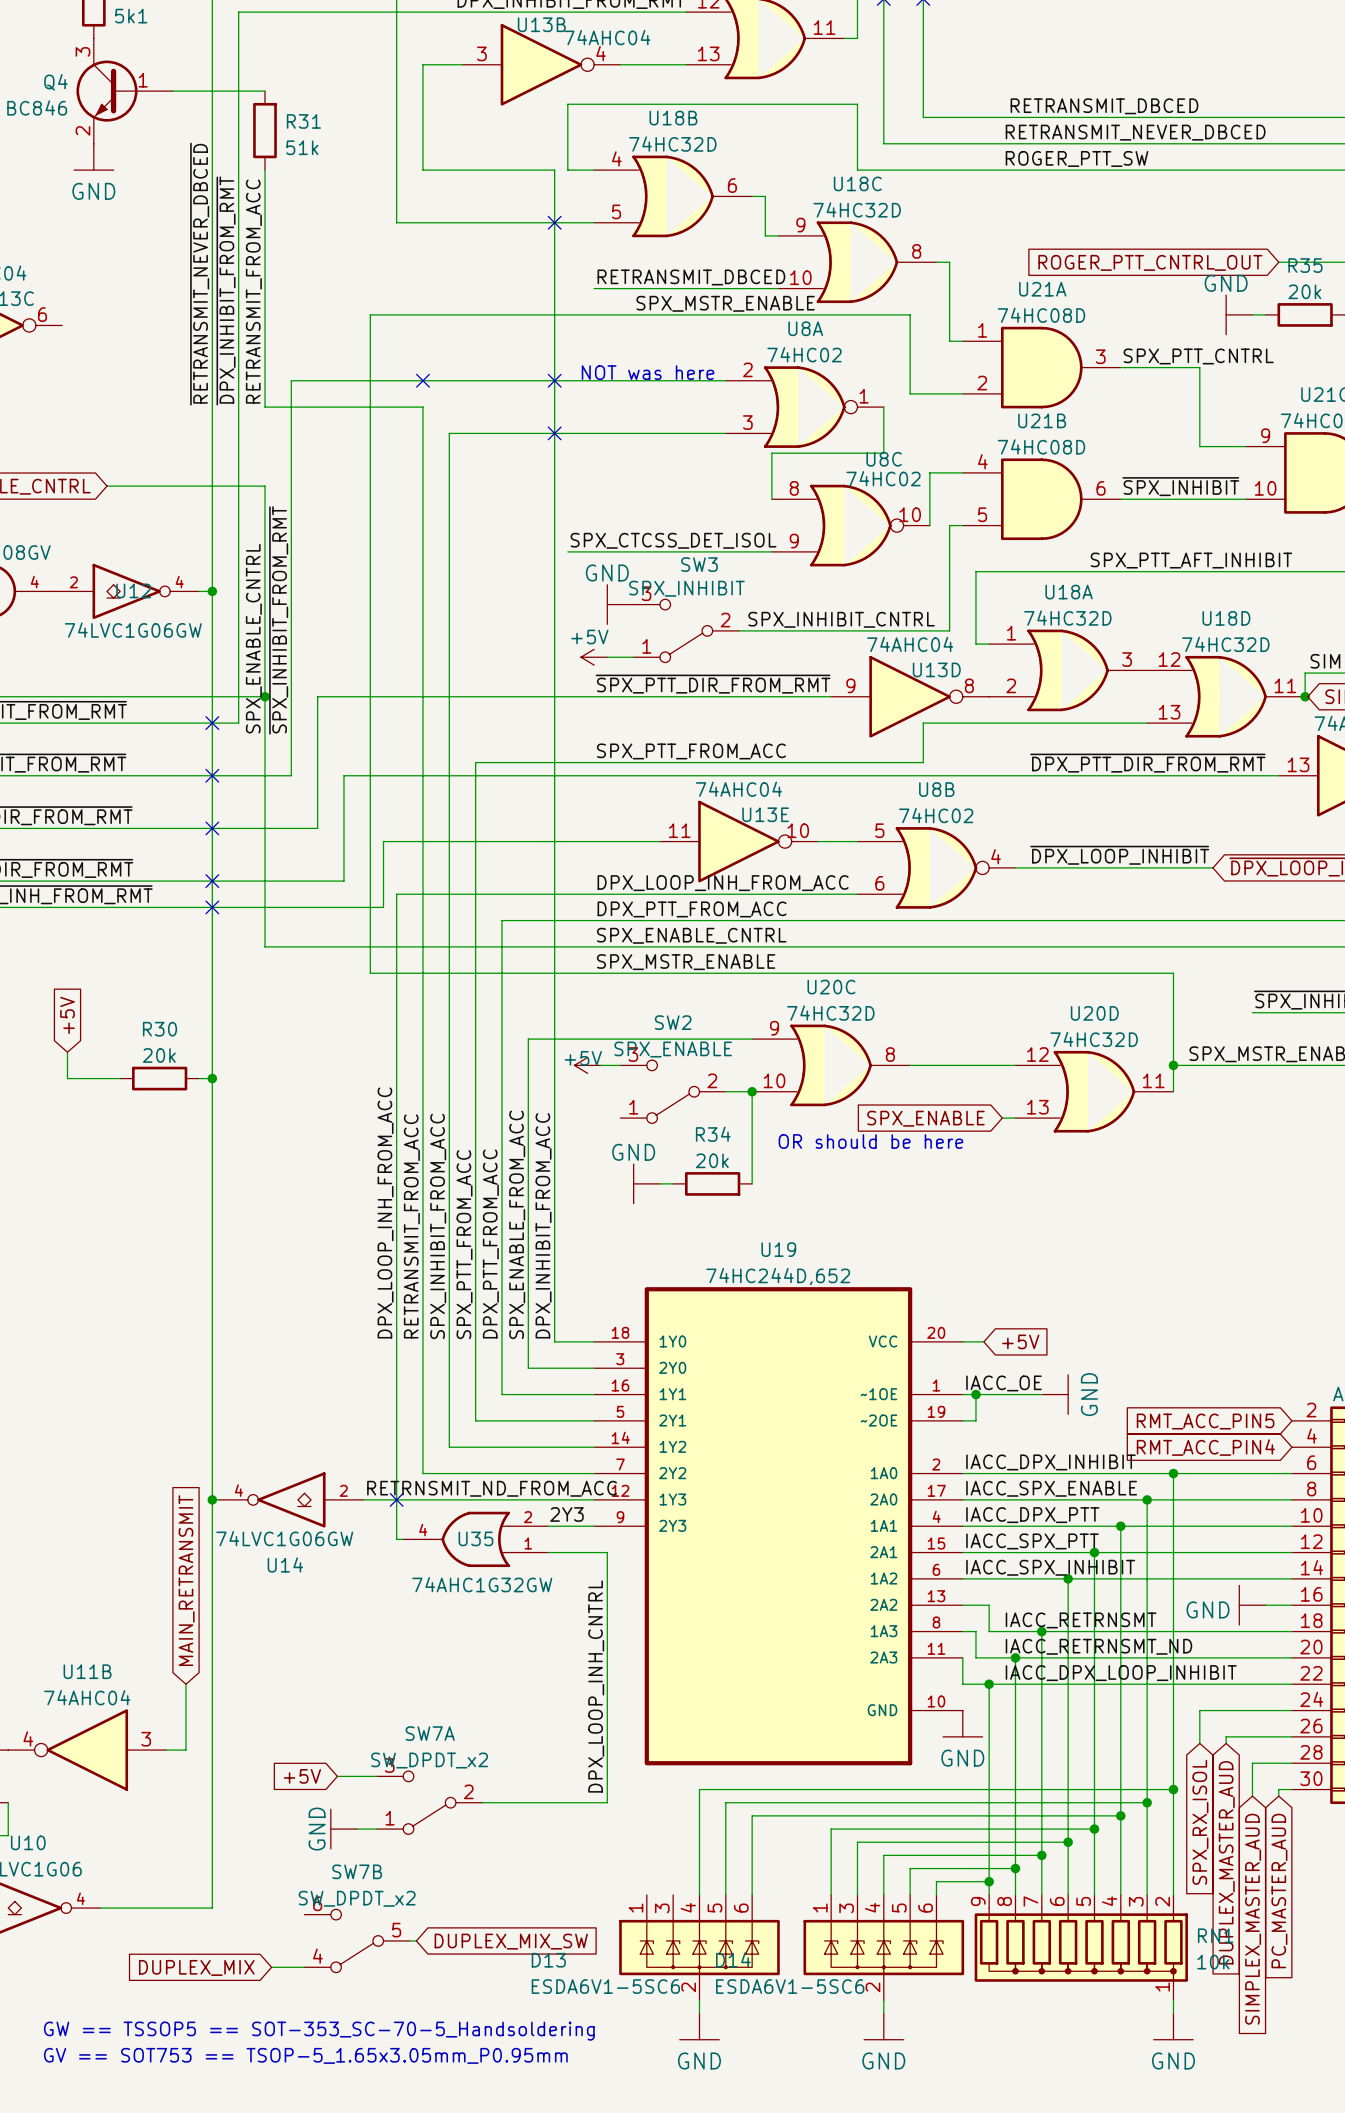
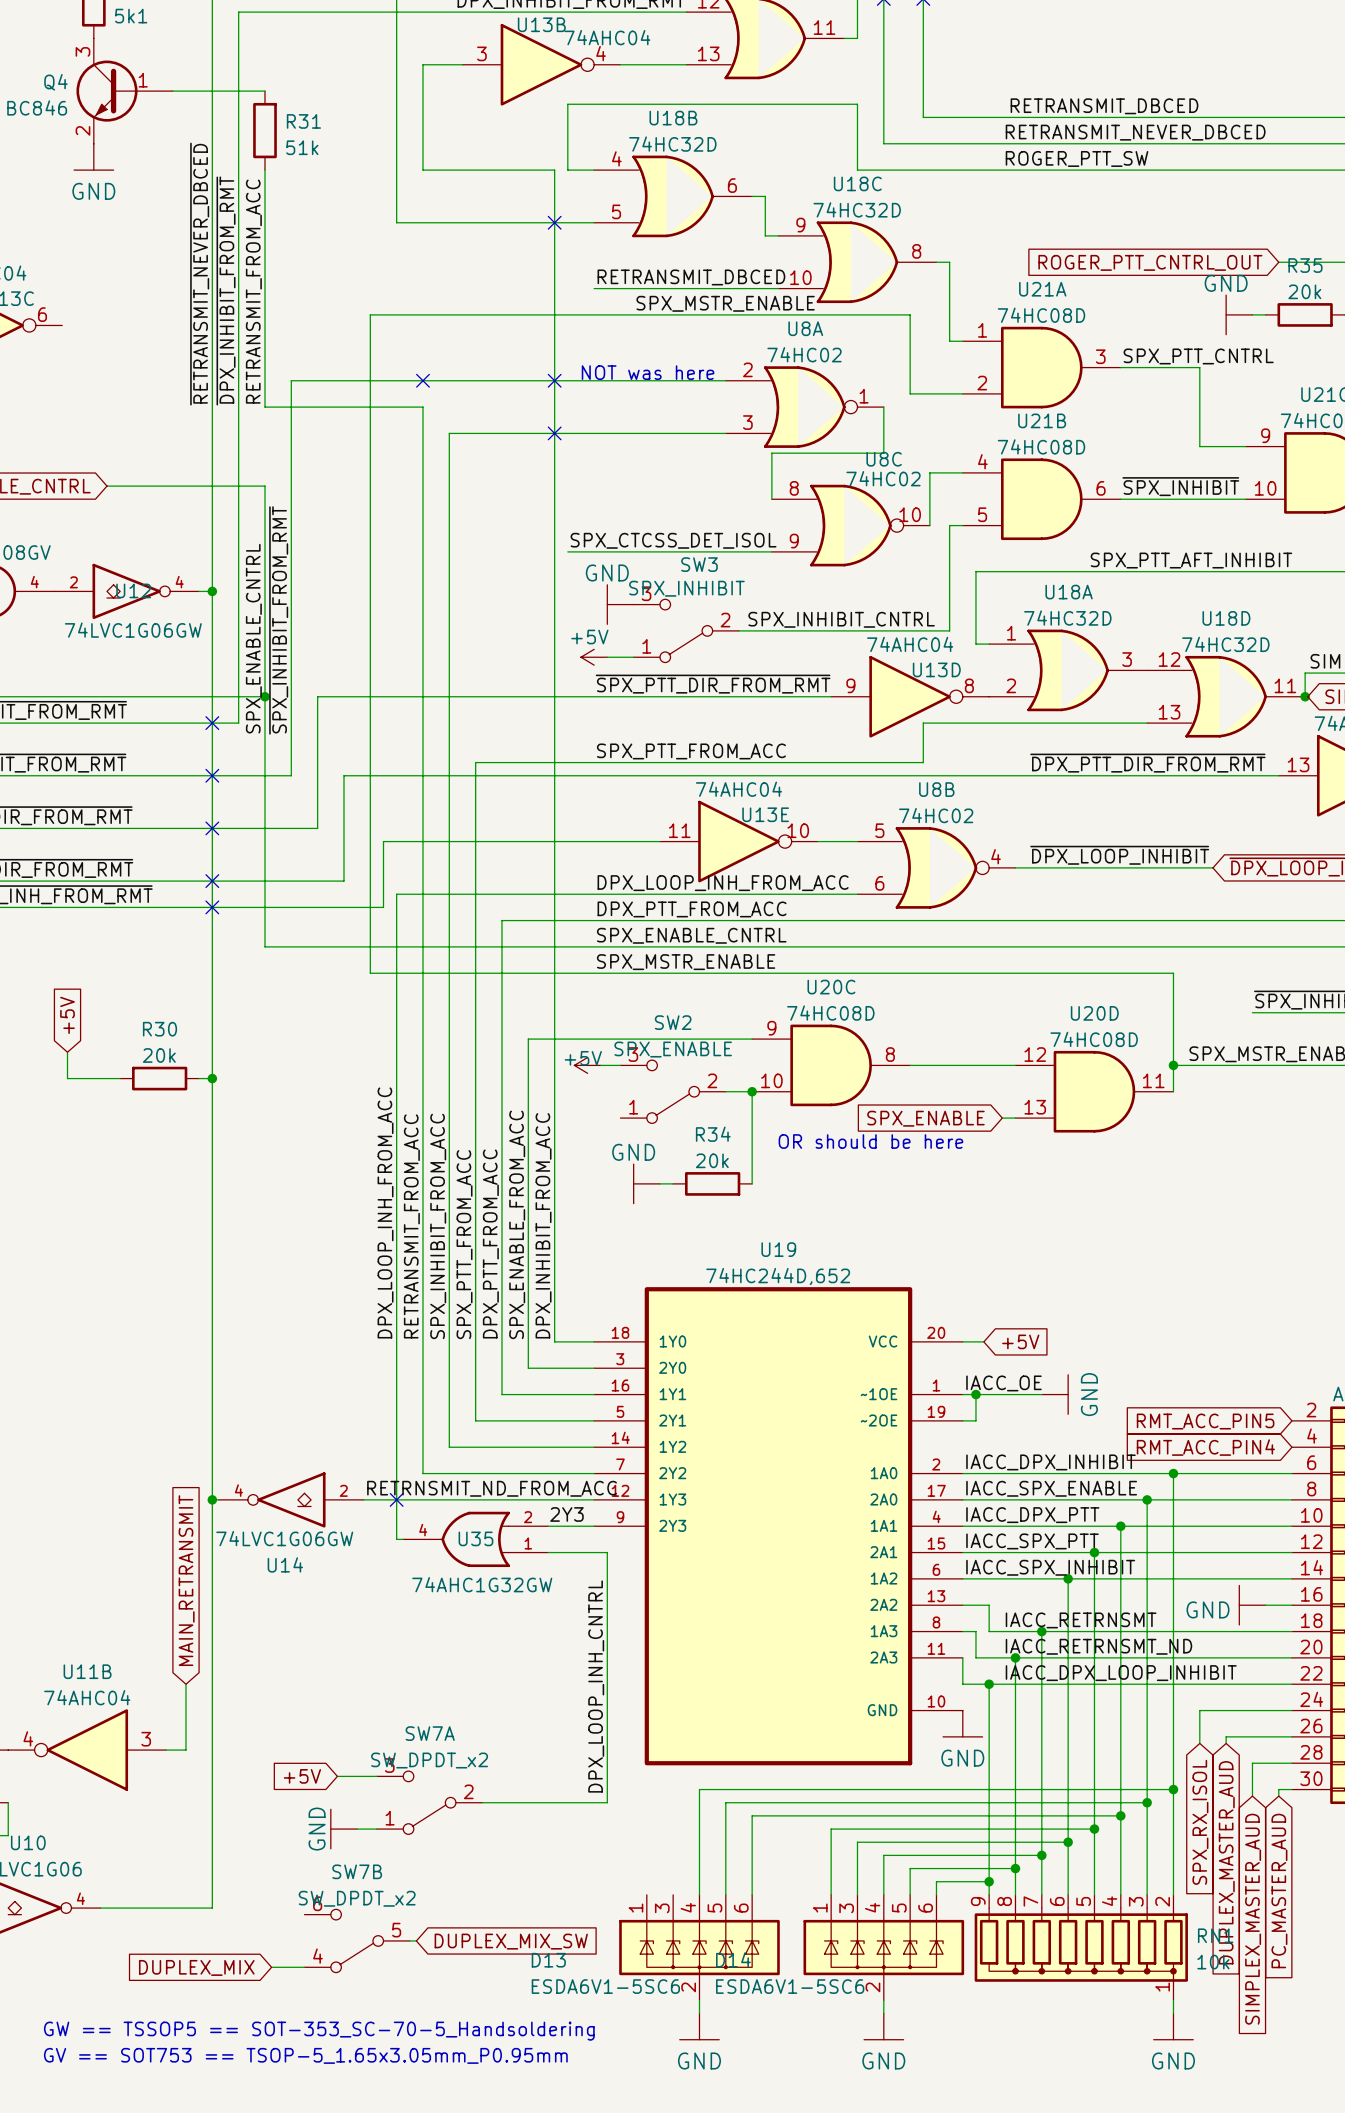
U20C value: 74HC32D (830, 1013) -> 74HC08D (830, 1013)
U20C symbol: [752, 1024, 911, 1107] -> [752, 1024, 911, 1107]
U20D value: 74HC32D (1094, 1039) -> 74HC08D (1094, 1039)
U20D symbol: [1015, 1050, 1174, 1133] -> [1015, 1050, 1174, 1133]

